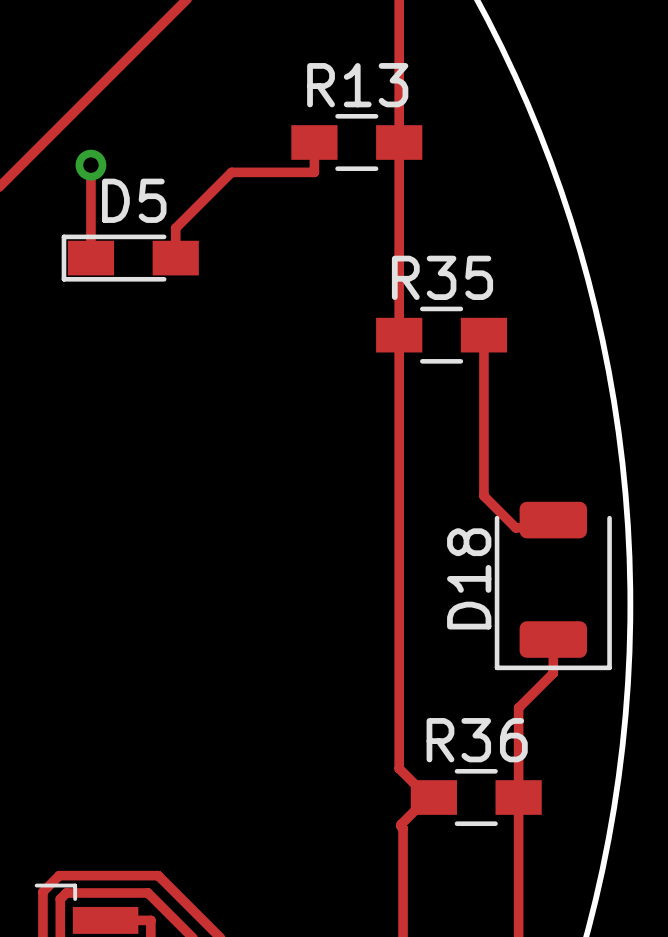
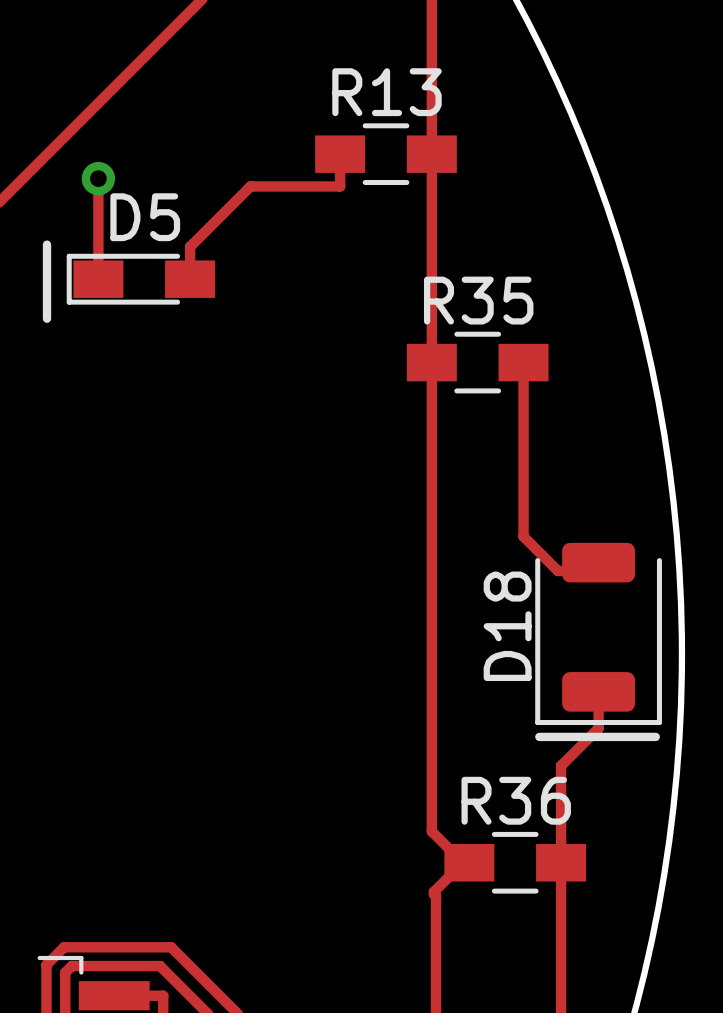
line: none -> (47, 244) (47, 318)
line: none -> (539, 736) (655, 736)

